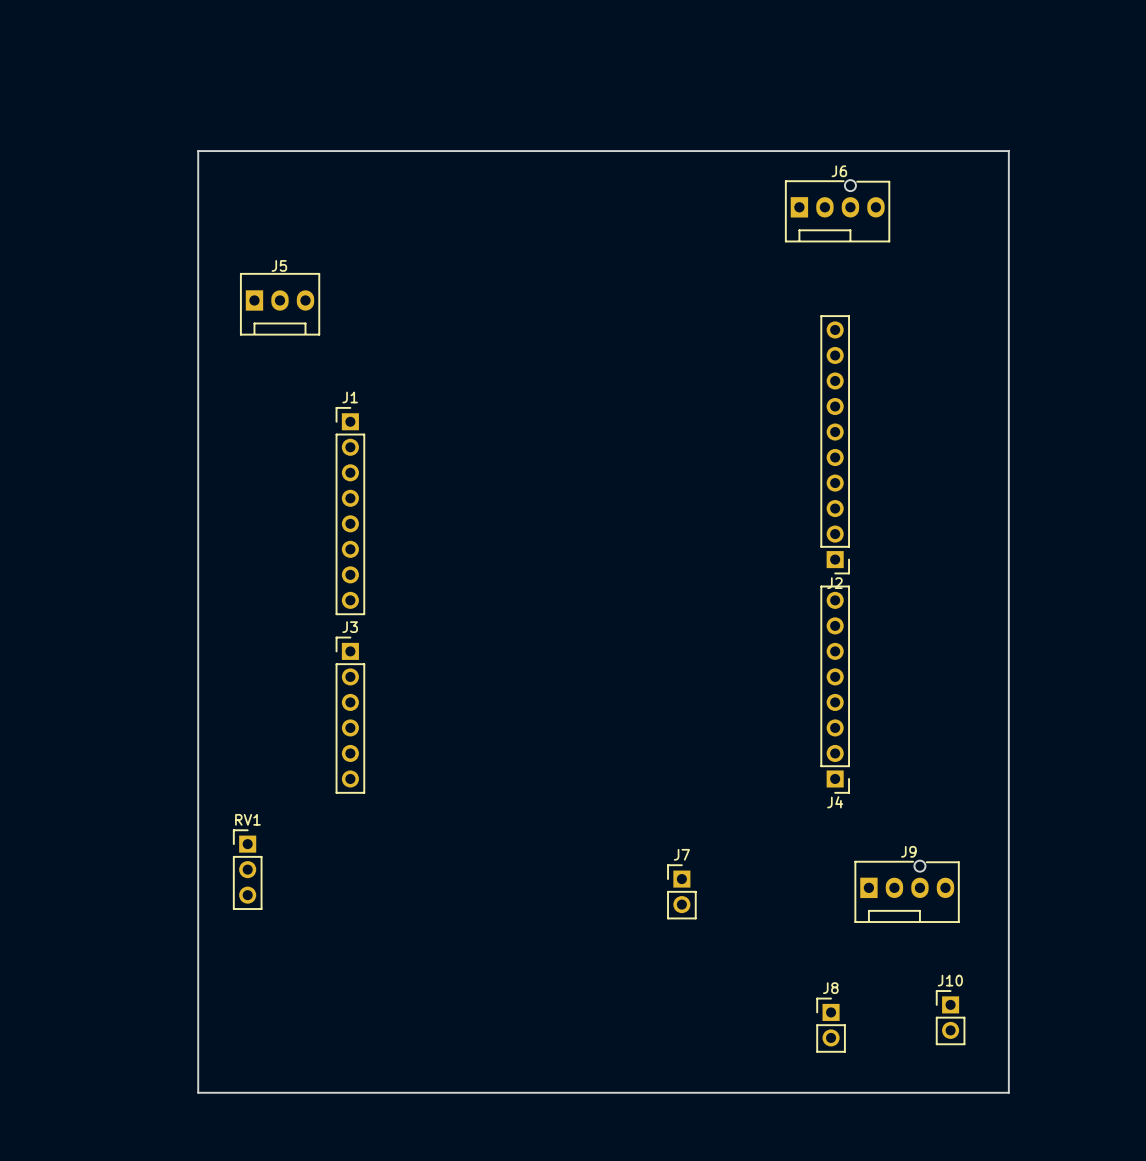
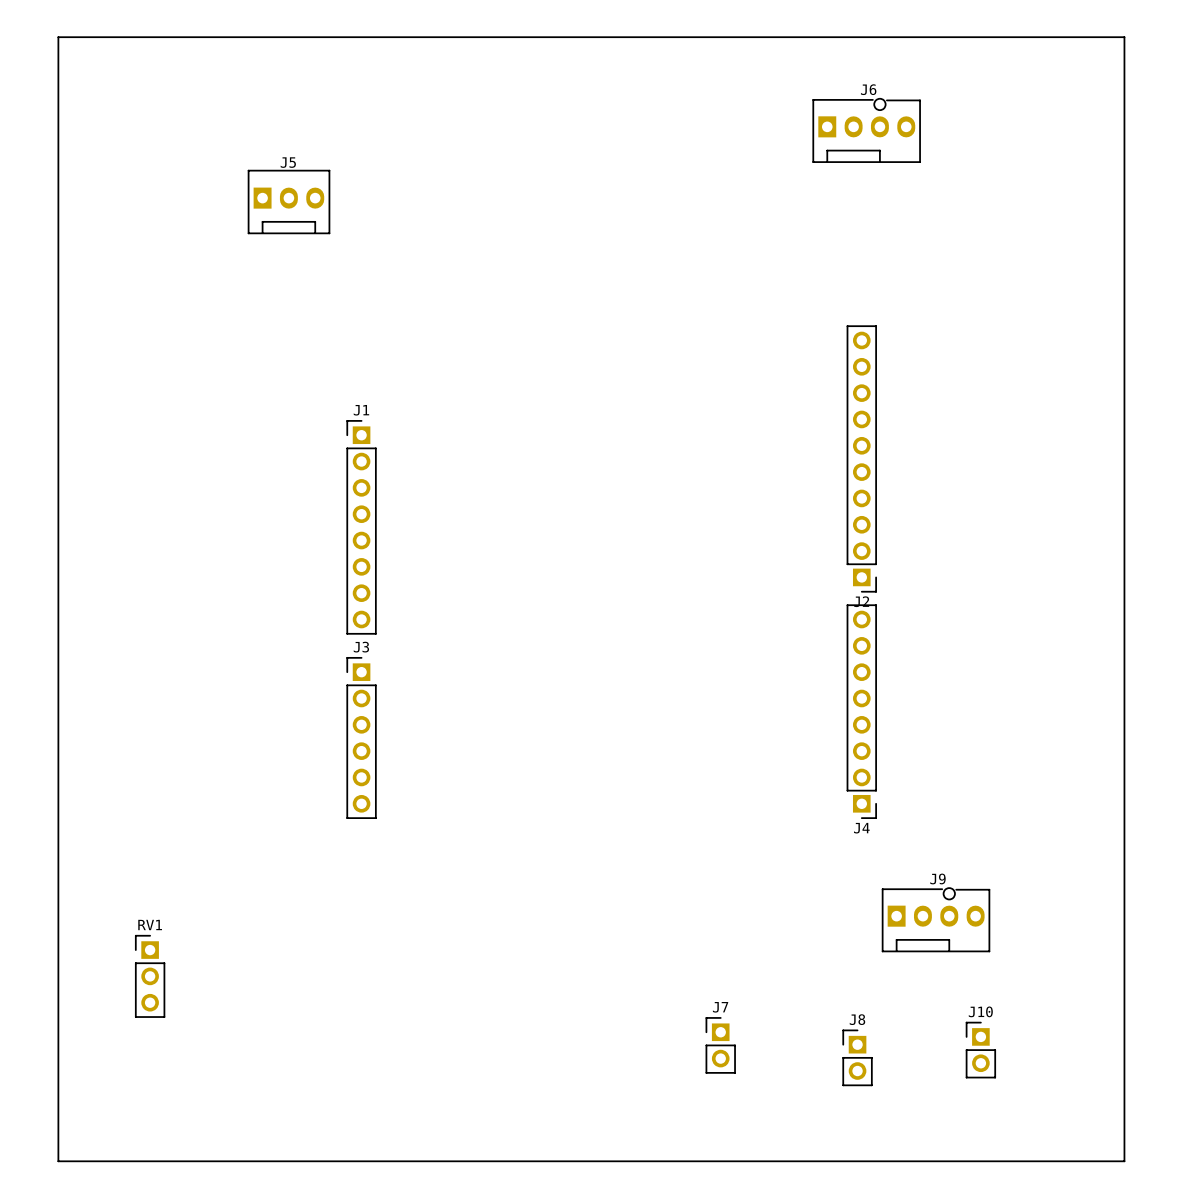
board edge: (198, 151) (1008, 151) (1008, 1092) (198, 1092) (198, 151) -> (58, 37) (58, 1161) (1124, 1161) (1124, 37) (58, 37)
J6 position: (837, 211) -> (866, 130)
J5 position: (280, 304) -> (289, 202)
RV1 position: (247, 869) -> (150, 976)
J7 position: (681, 891) -> (720, 1045)

